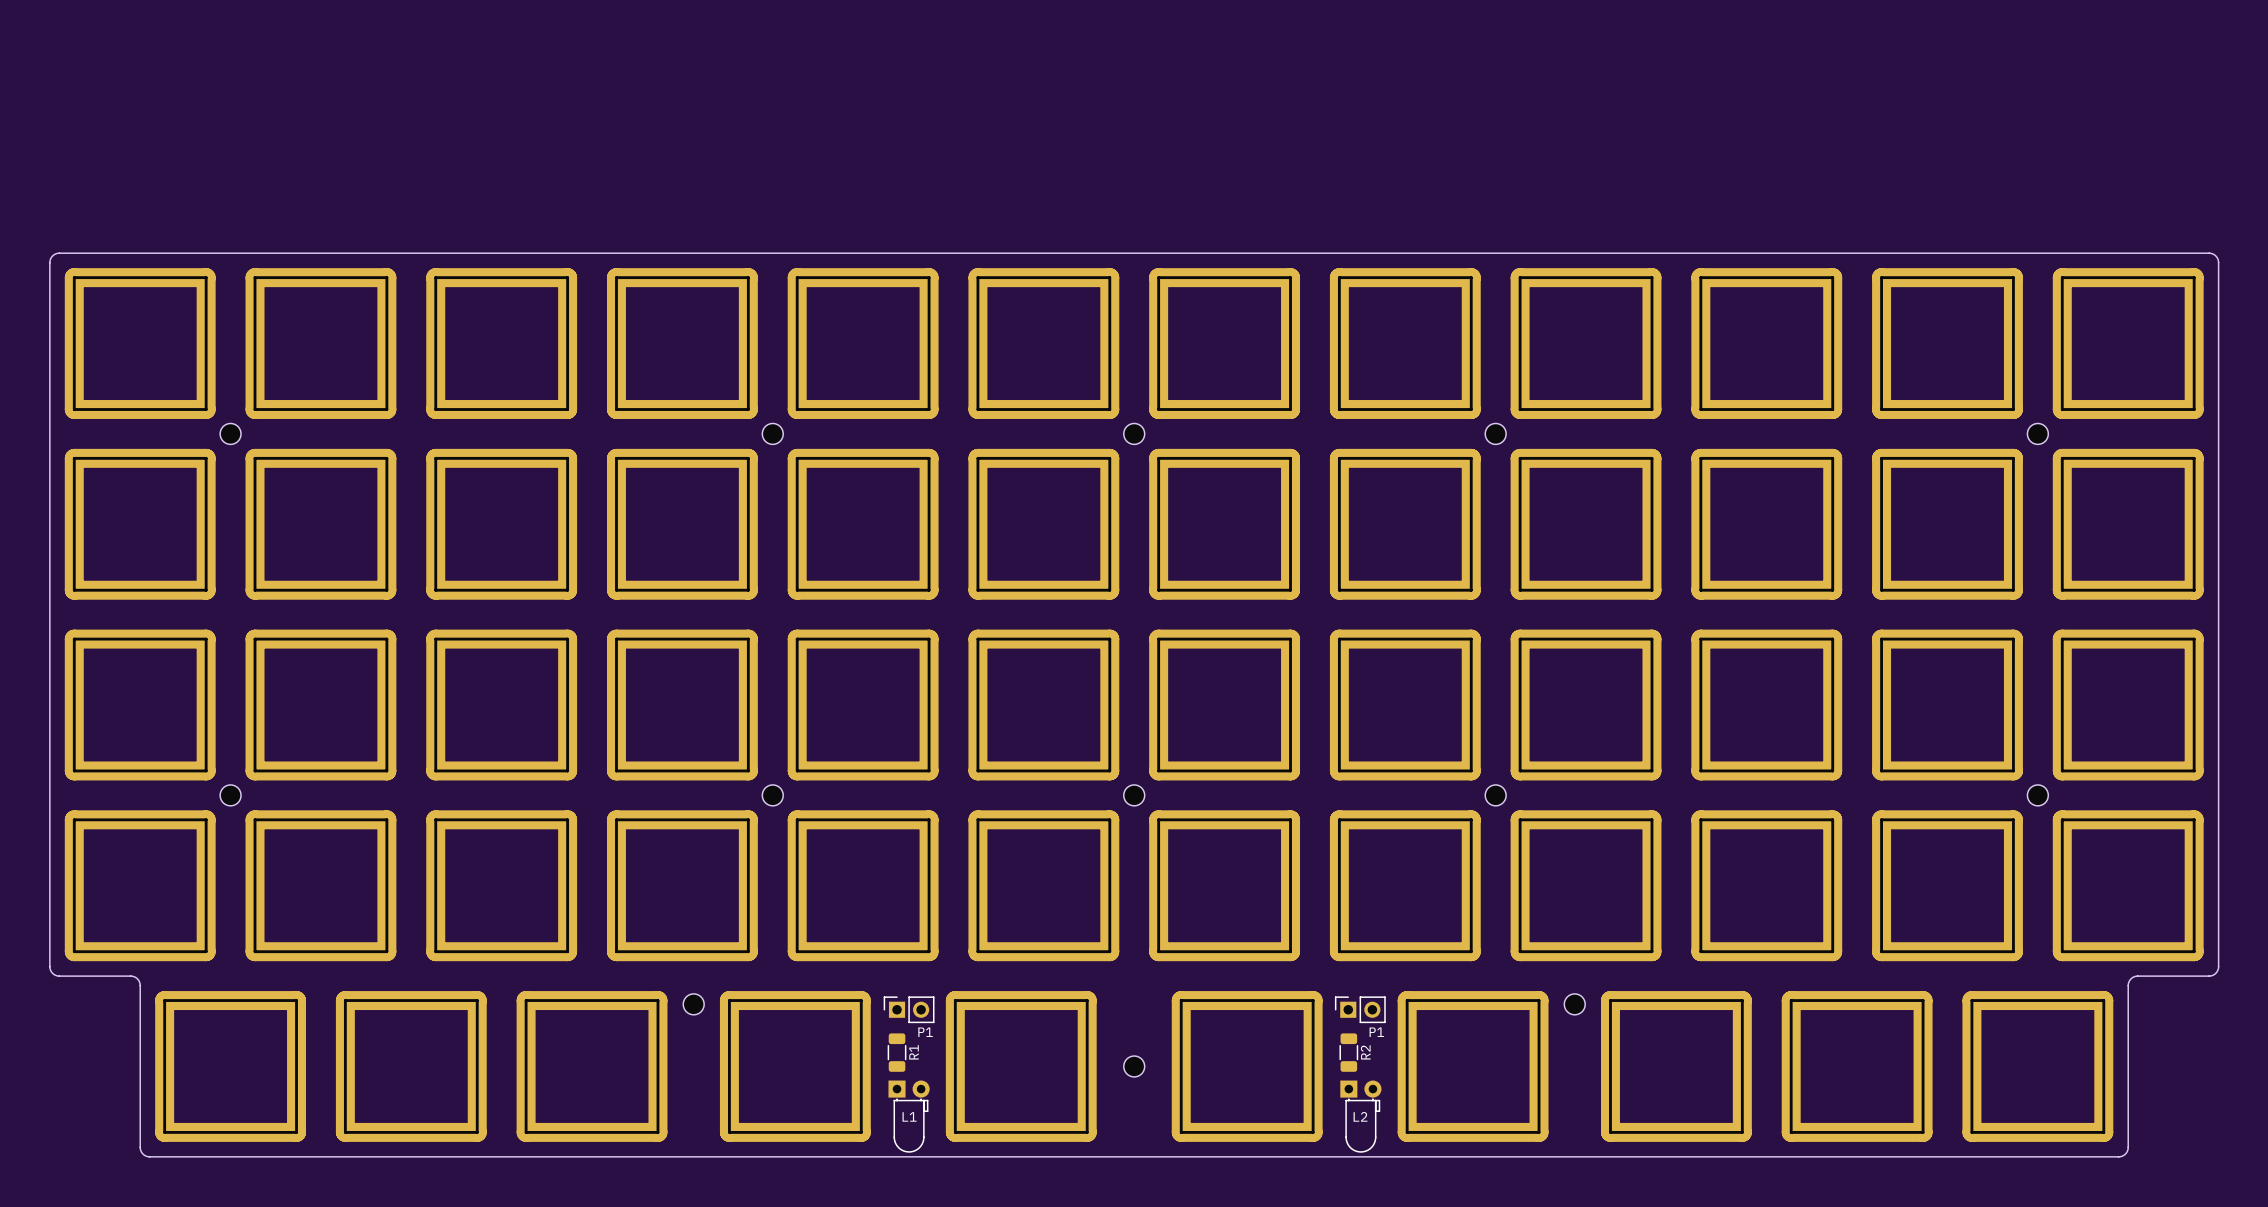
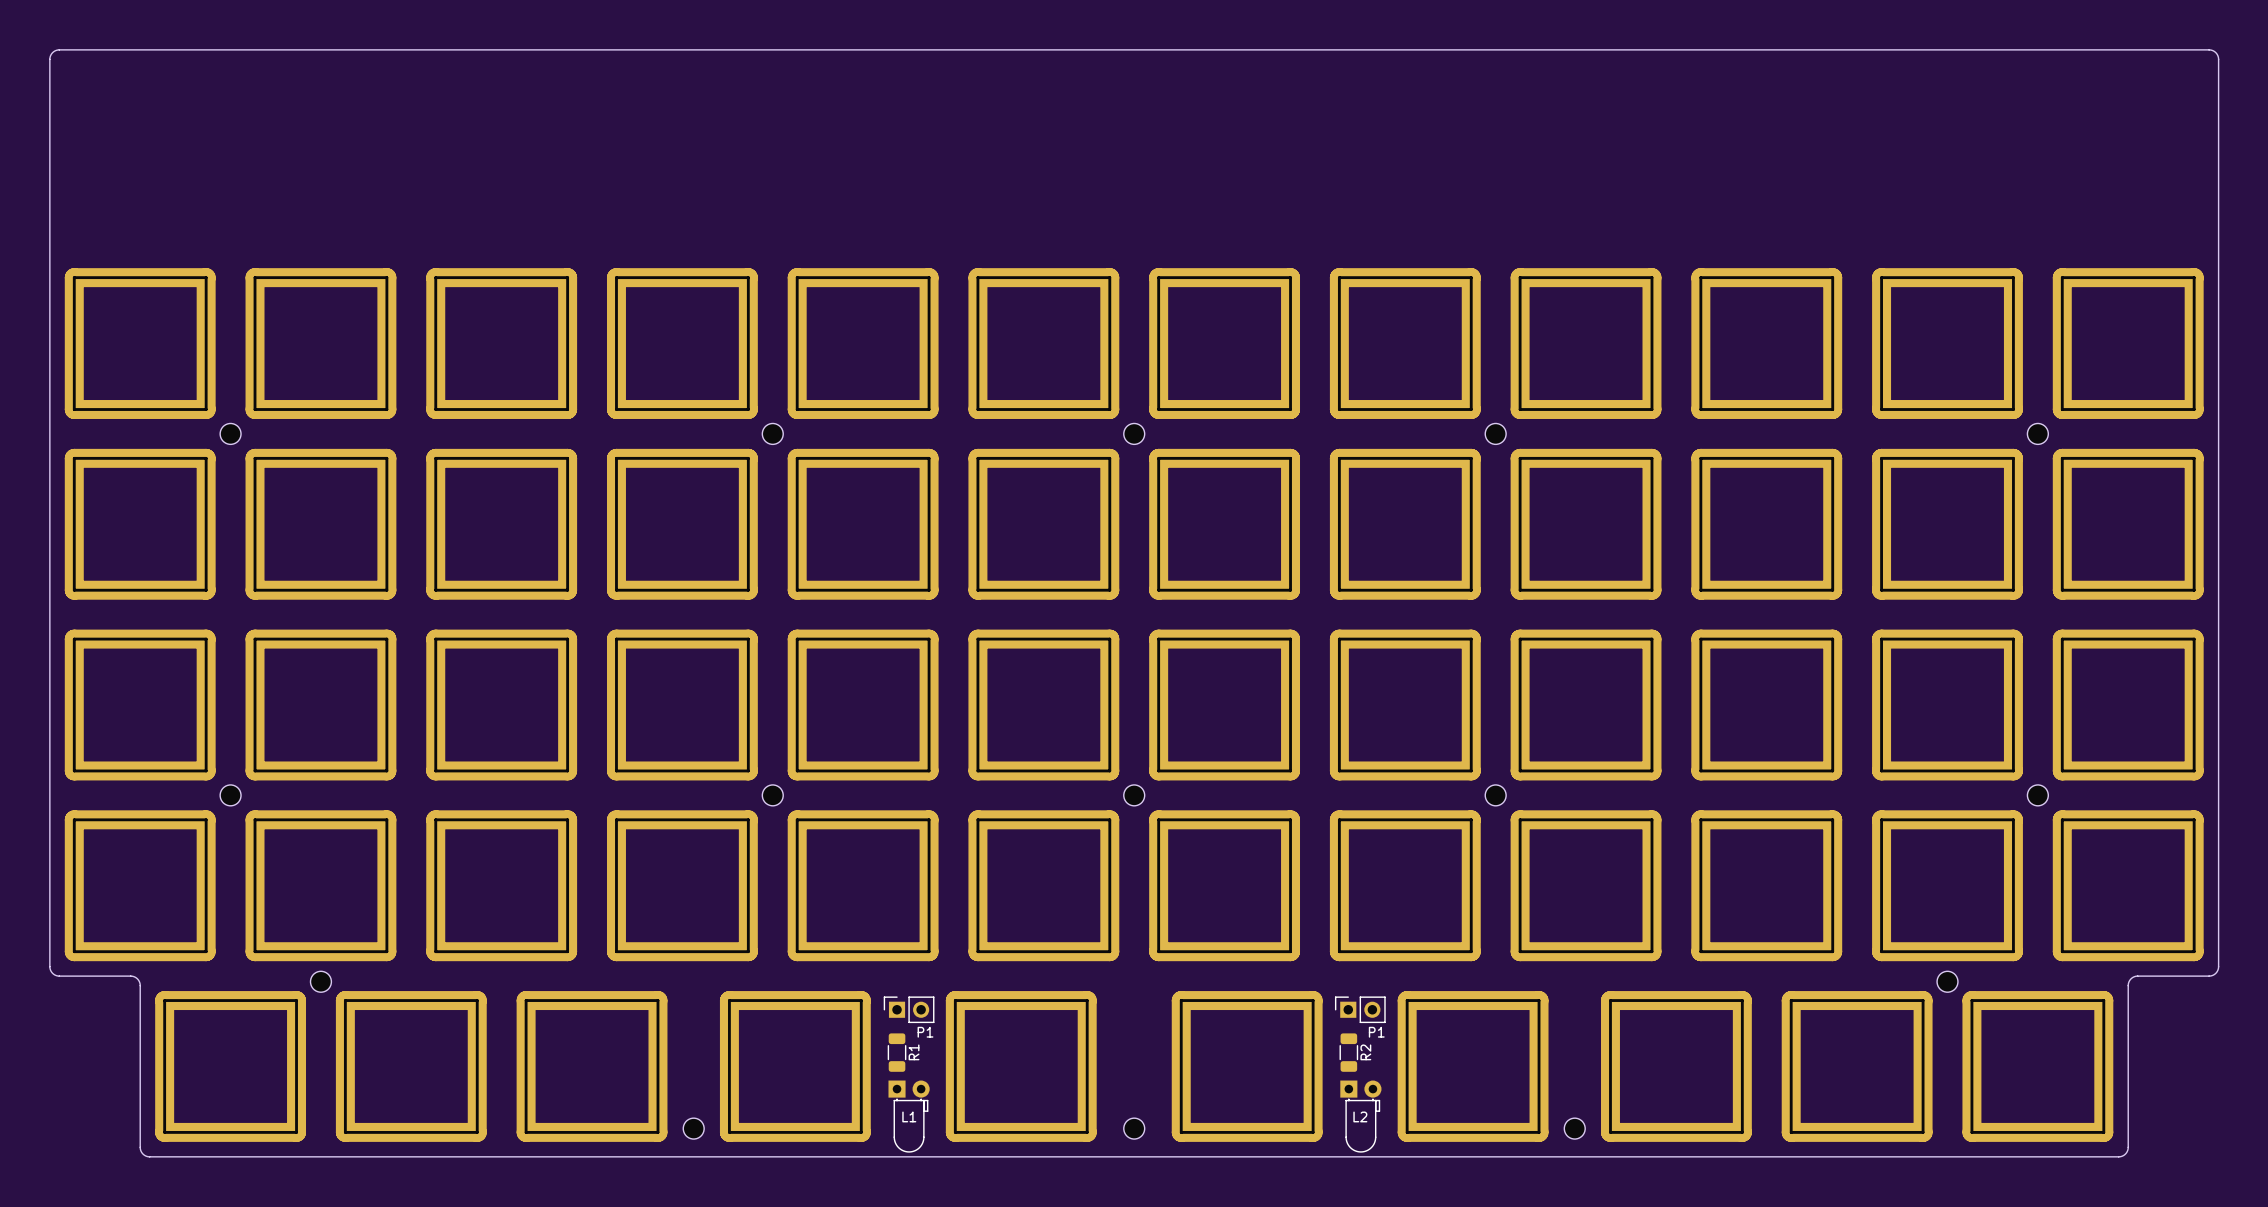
board edge: (49, 262) (52, 255) (59, 253) (2209, 253) (2215, 255) (2218, 262) -> (49, 262) (49, 59) (52, 52) (59, 49) (2210, 49) (2216, 53) (2218, 59) (2218, 262)
part: none -> (320, 981)
part: none -> (1947, 981)
part position: (693, 1004) -> (693, 1128)
part position: (1574, 1004) -> (1574, 1128)
part position: (1134, 1066) -> (1134, 1128)

